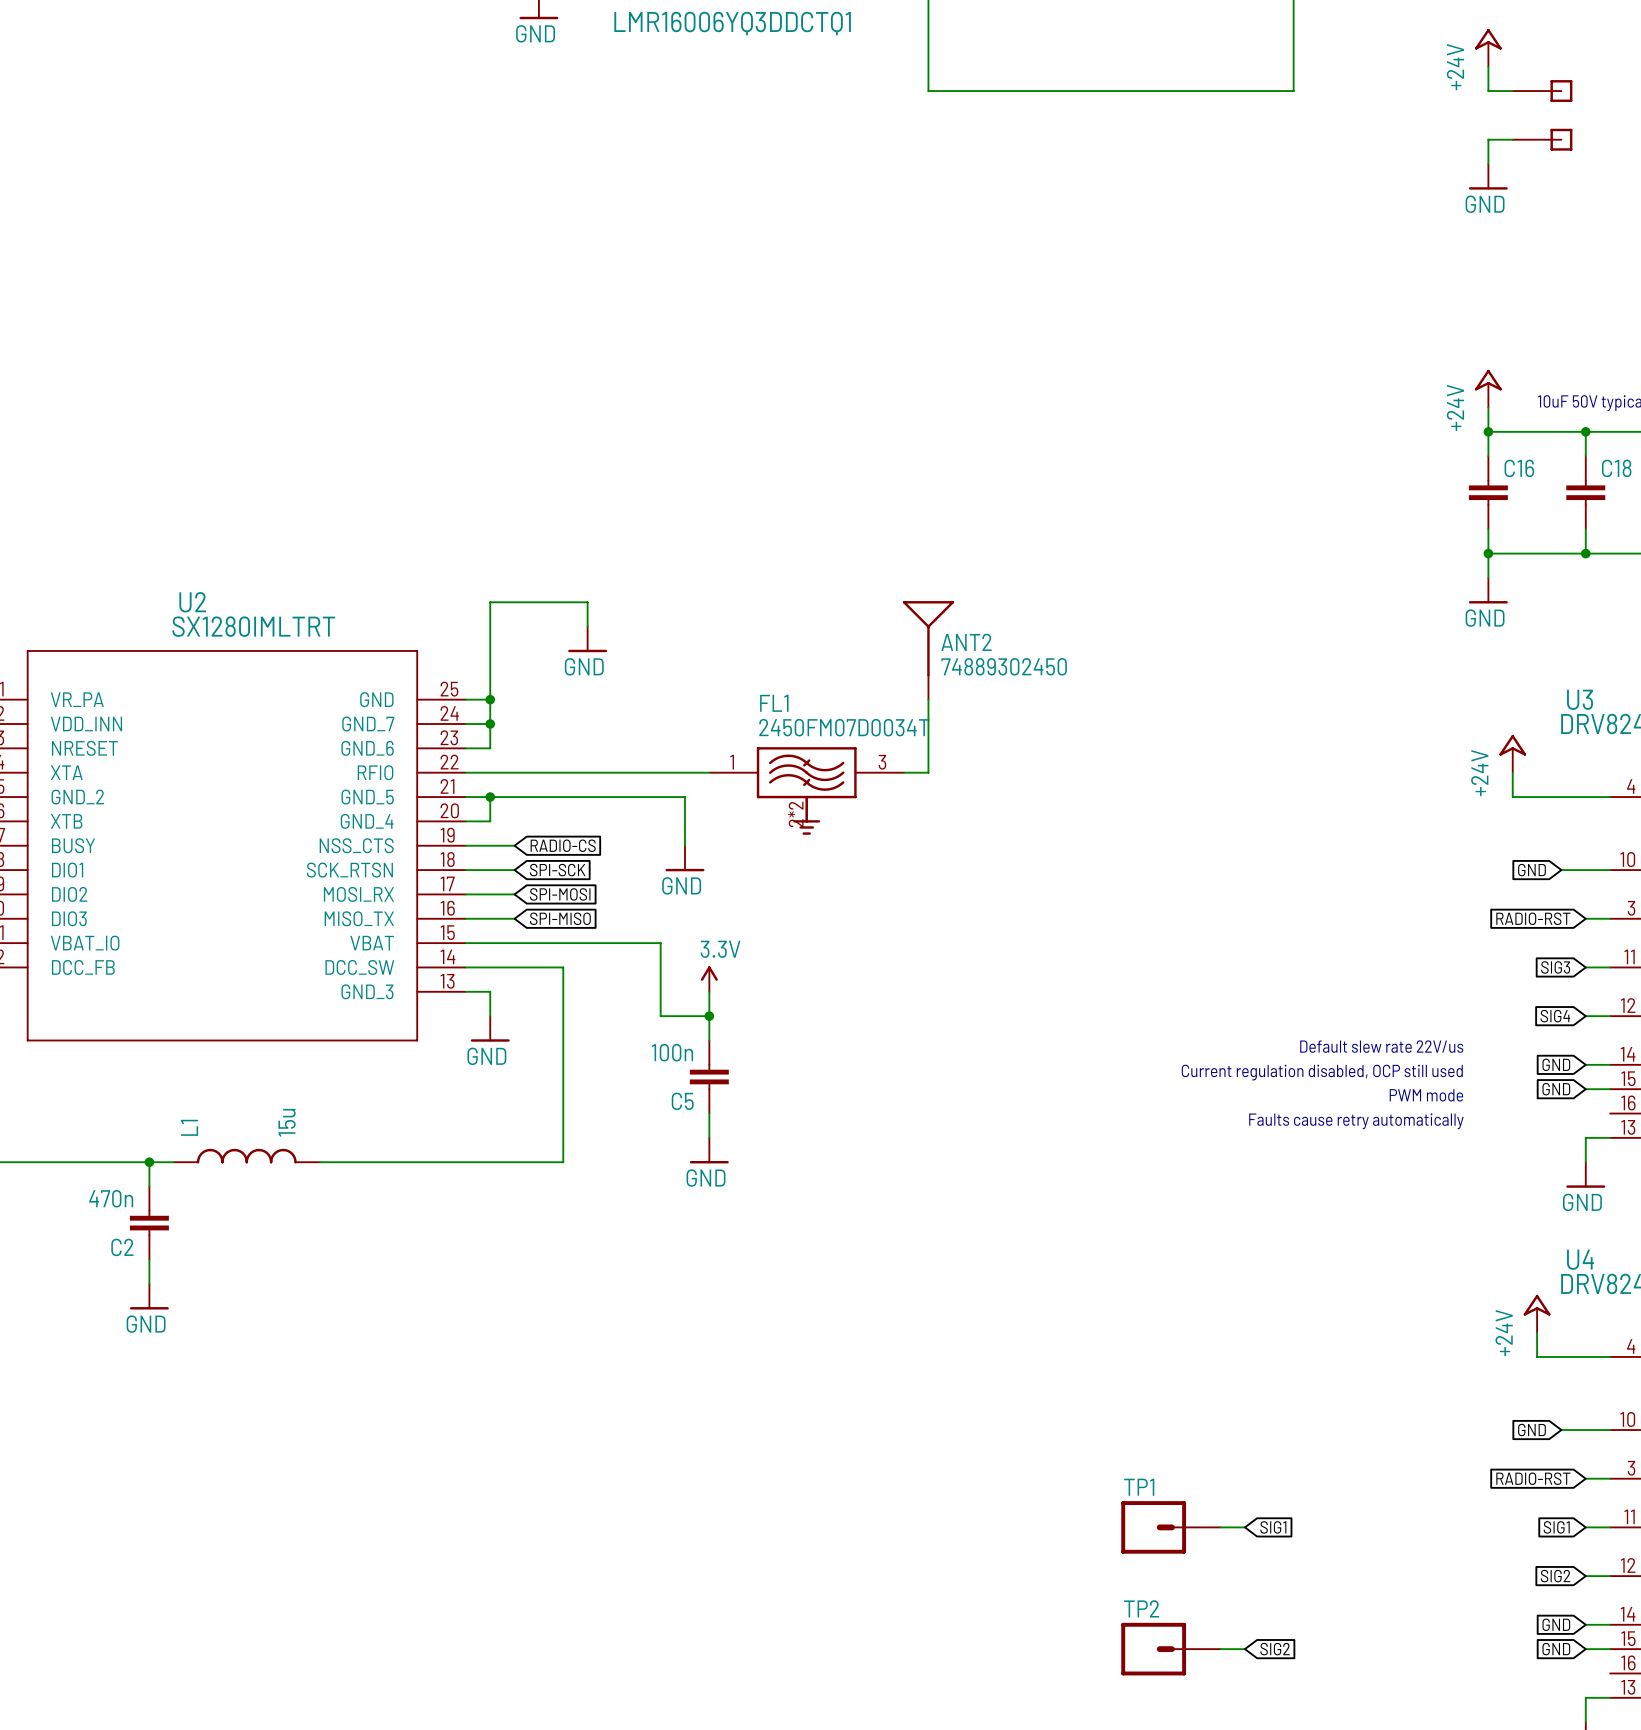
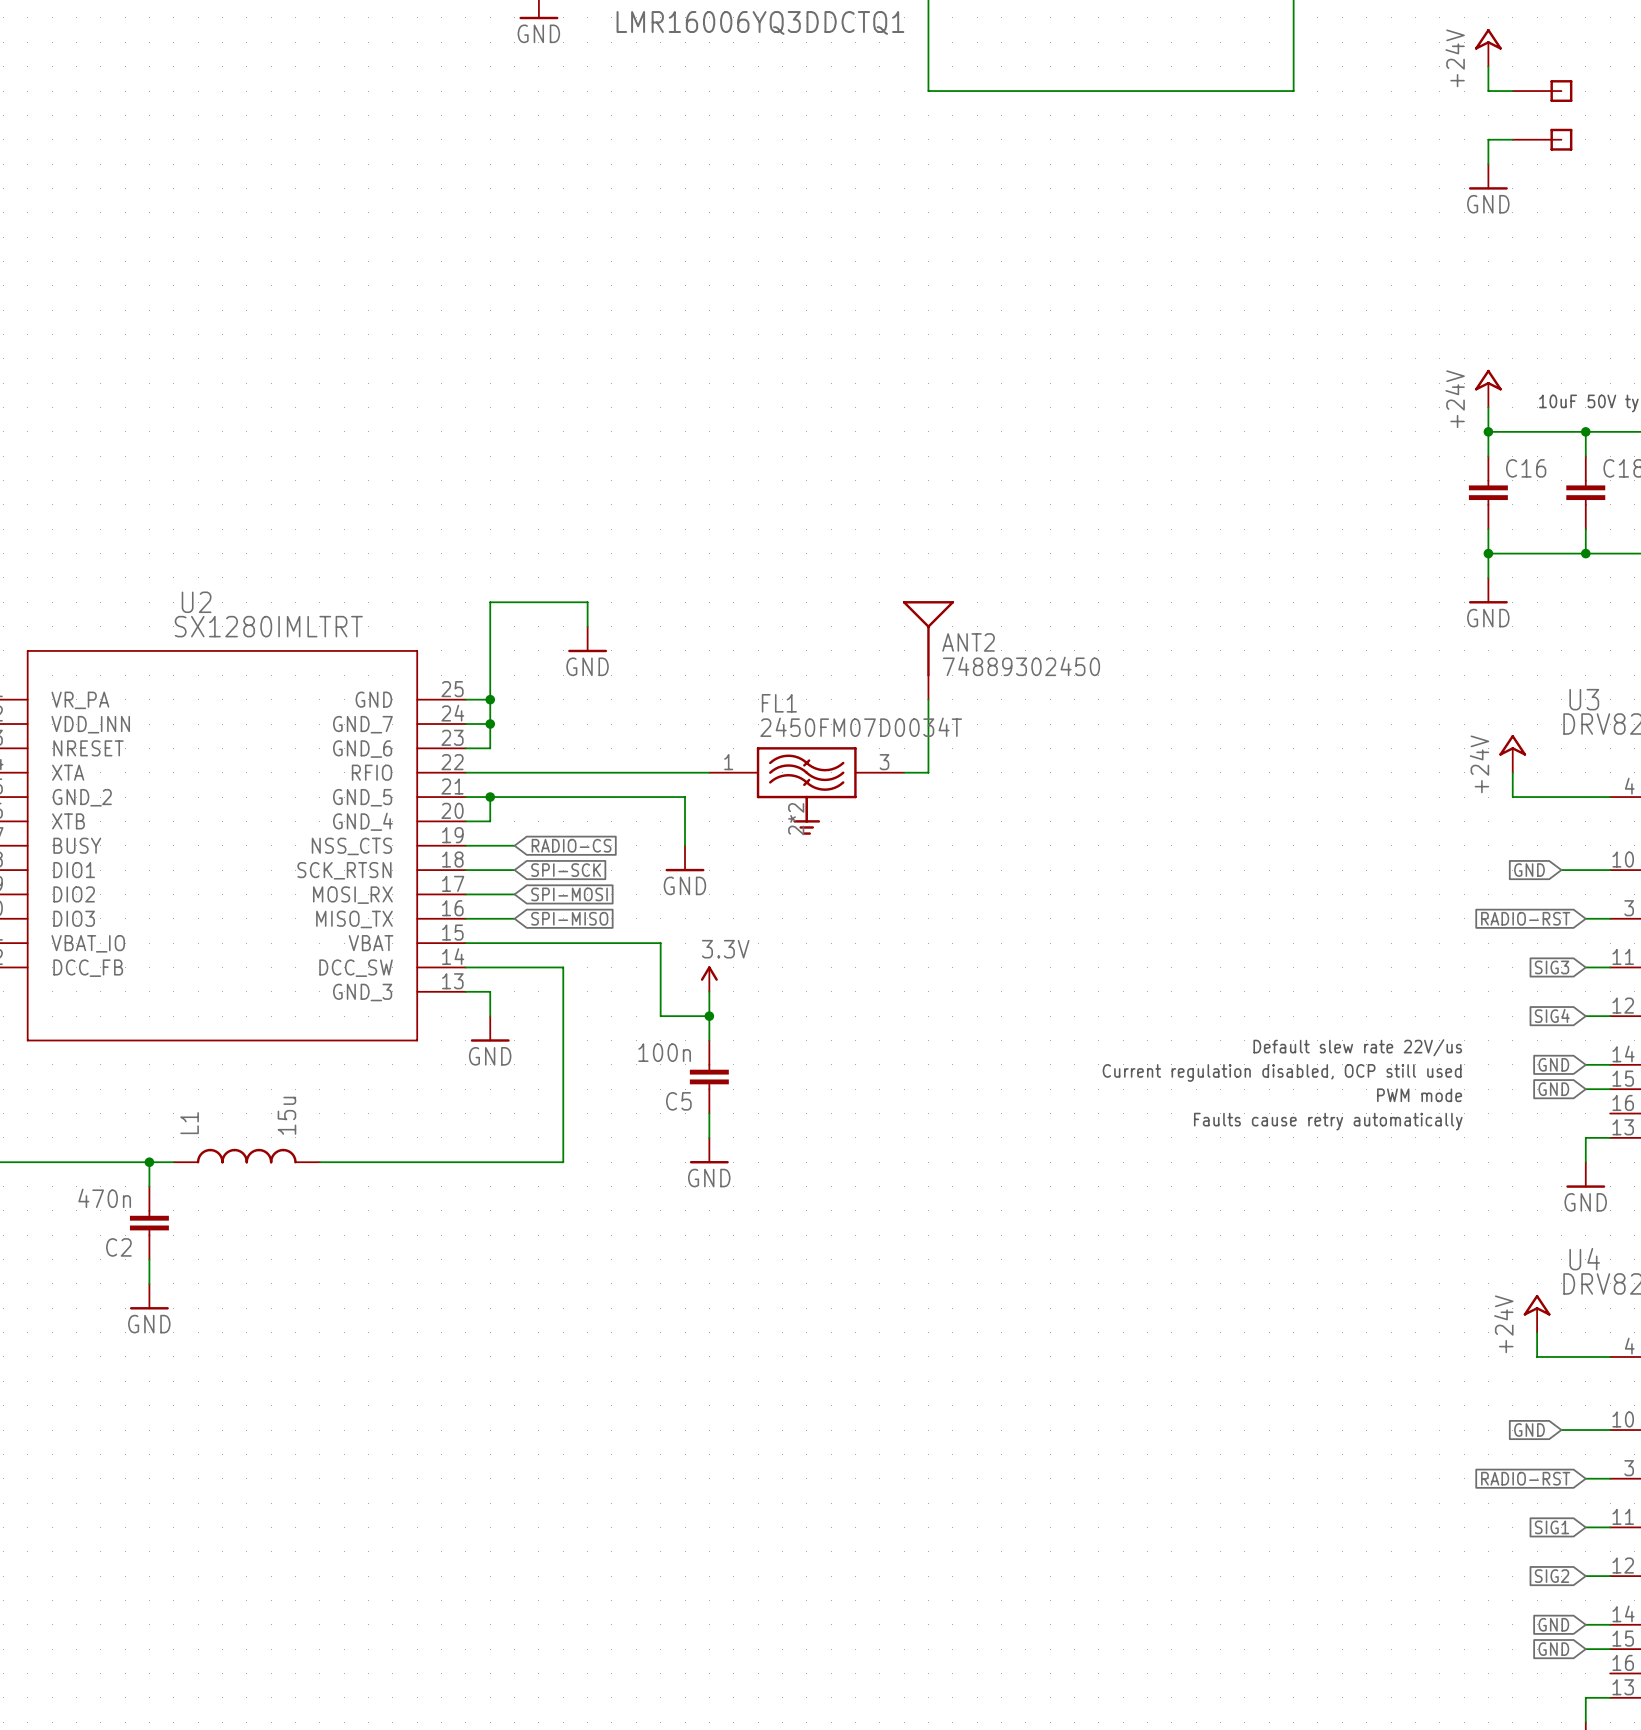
TP1: (1170, 1527) -> none
wire: (1220, 1527) (1244, 1527) -> none
global label: SIG1 (1273, 1527) -> none
TP2: (1170, 1649) -> none
wire: (1220, 1649) (1244, 1649) -> none
global label: SIG2 (1275, 1649) -> none

